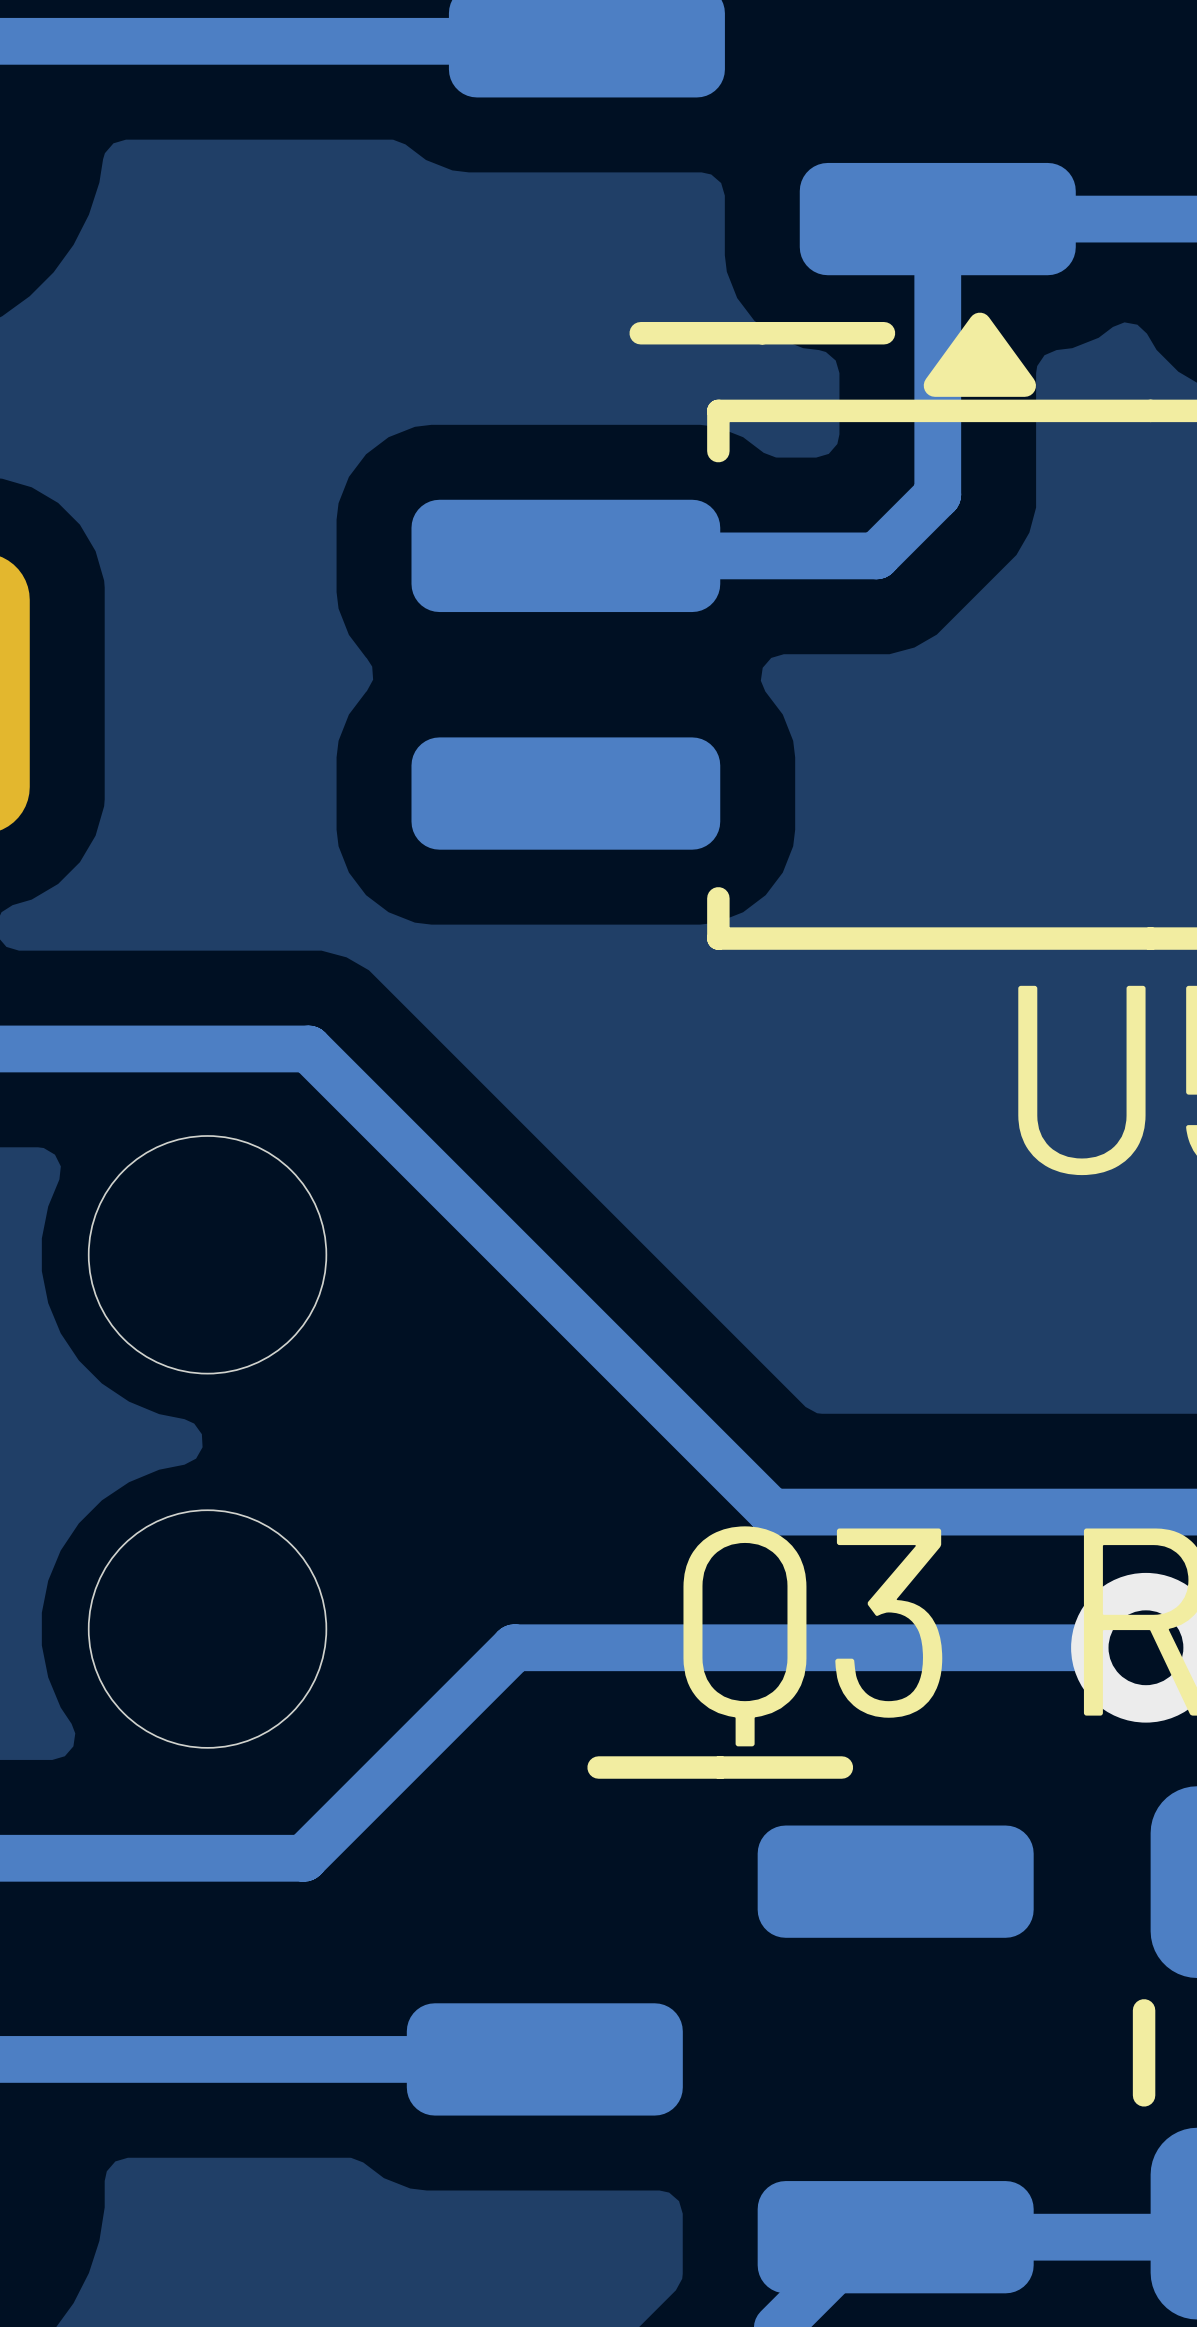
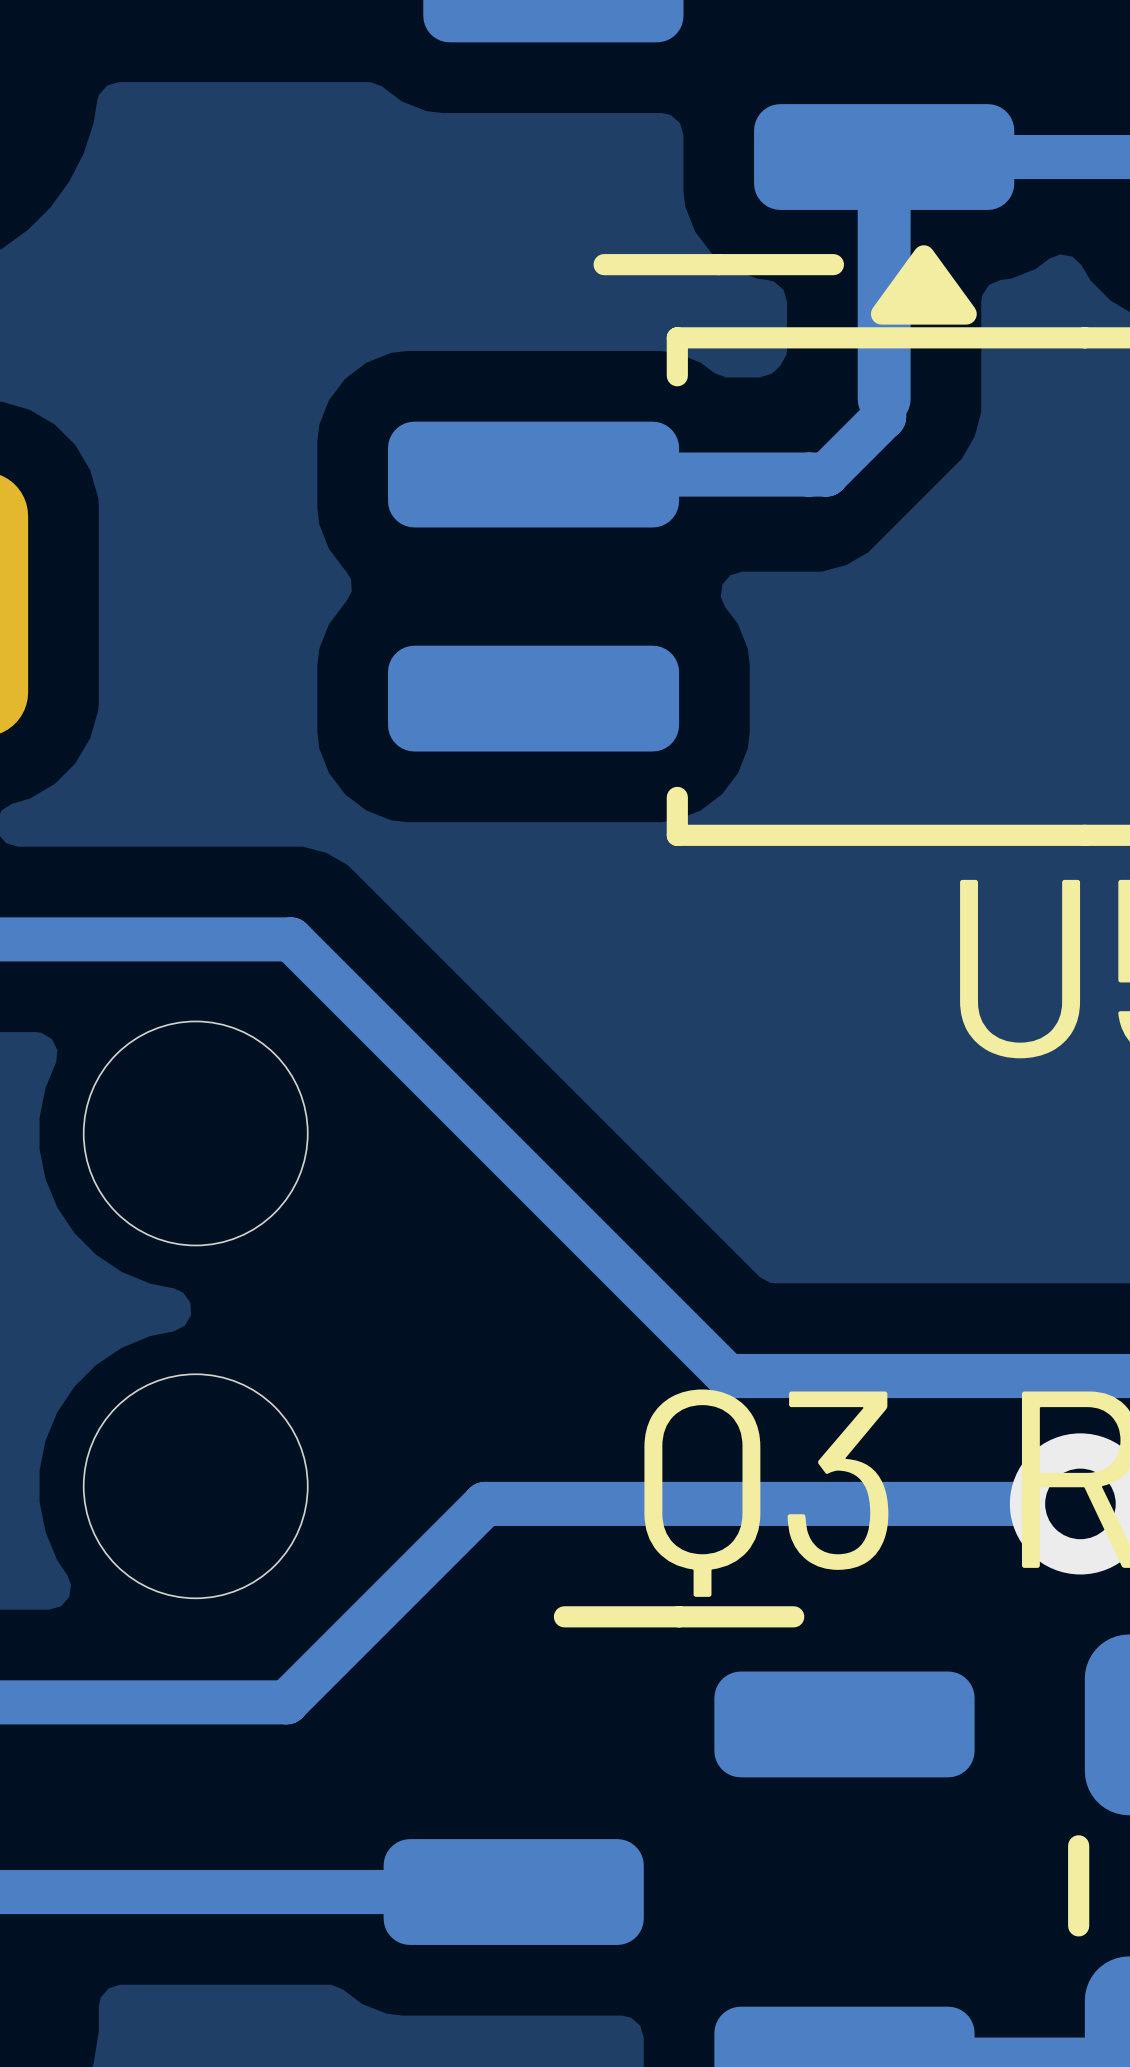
track width: thin (937, 219) (937, 475) -> thick (884, 157) (884, 399)

